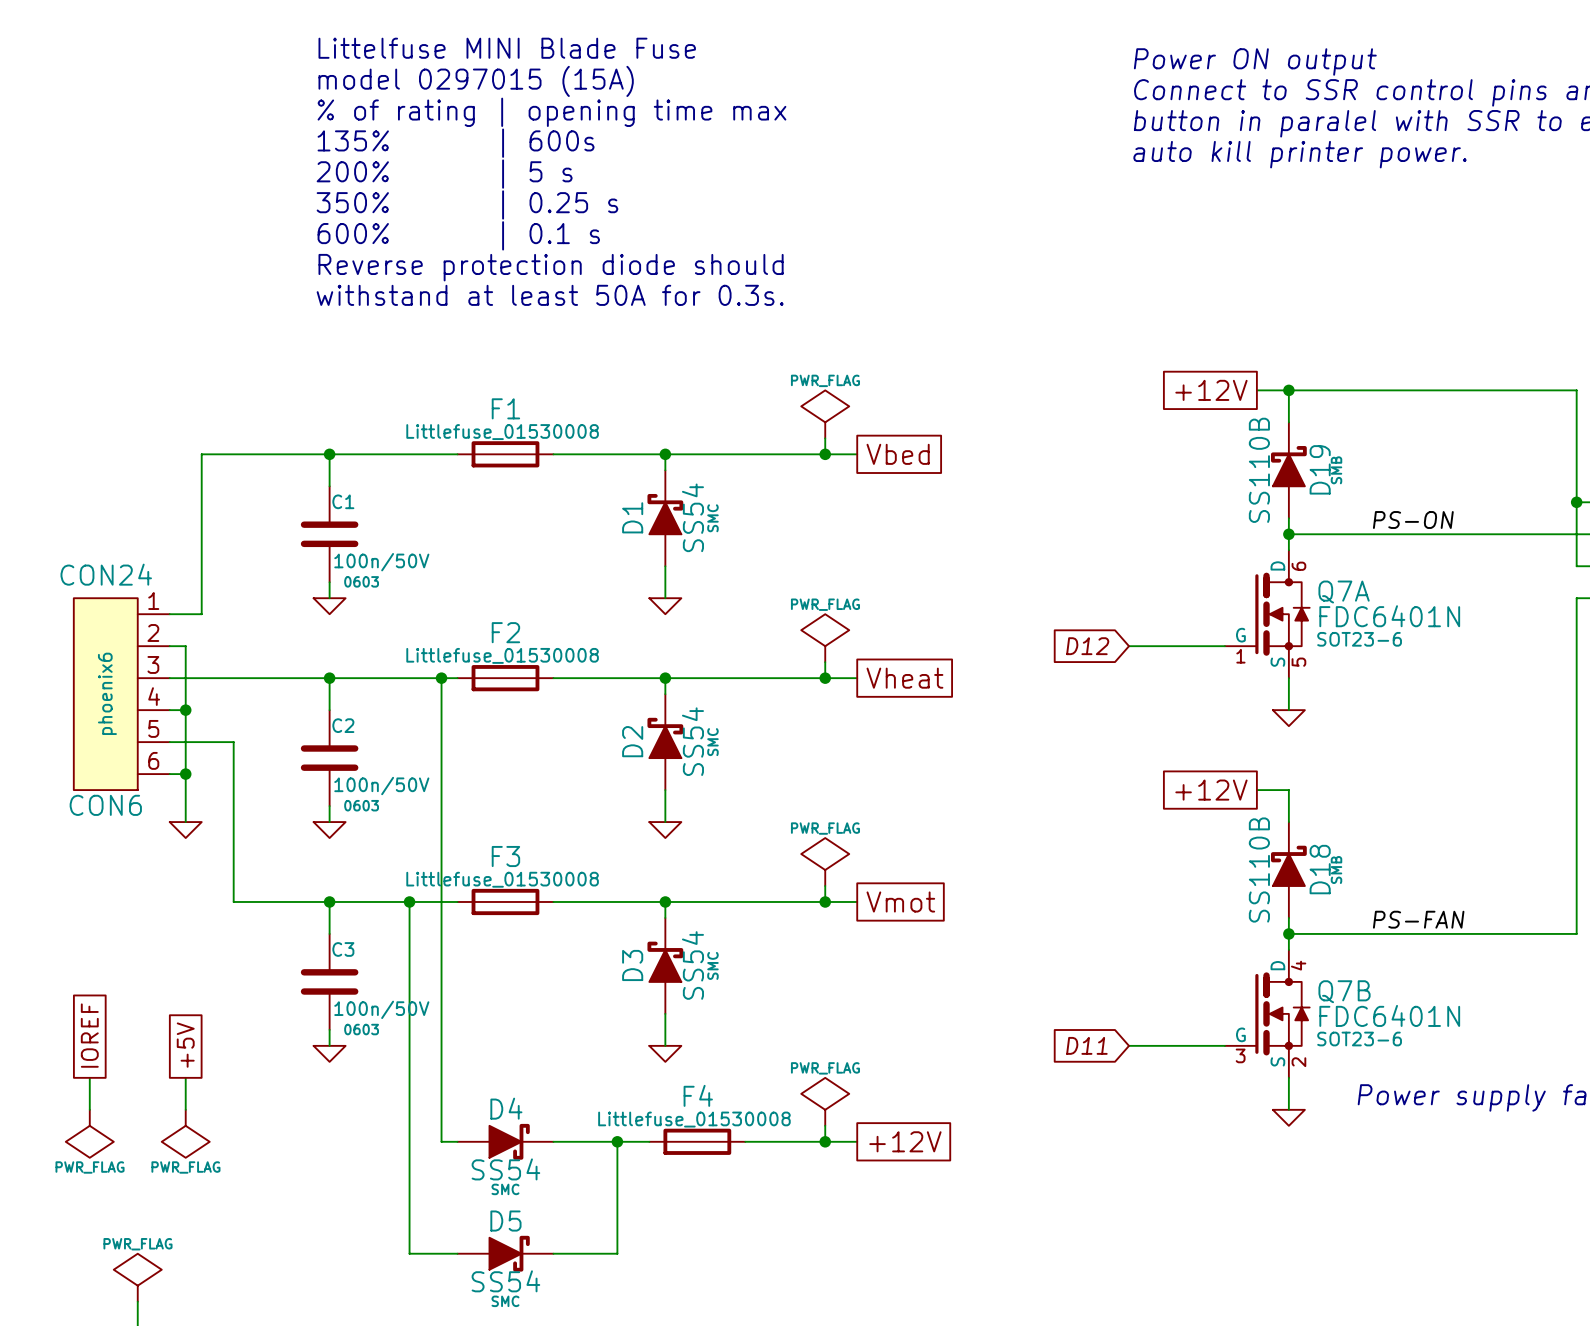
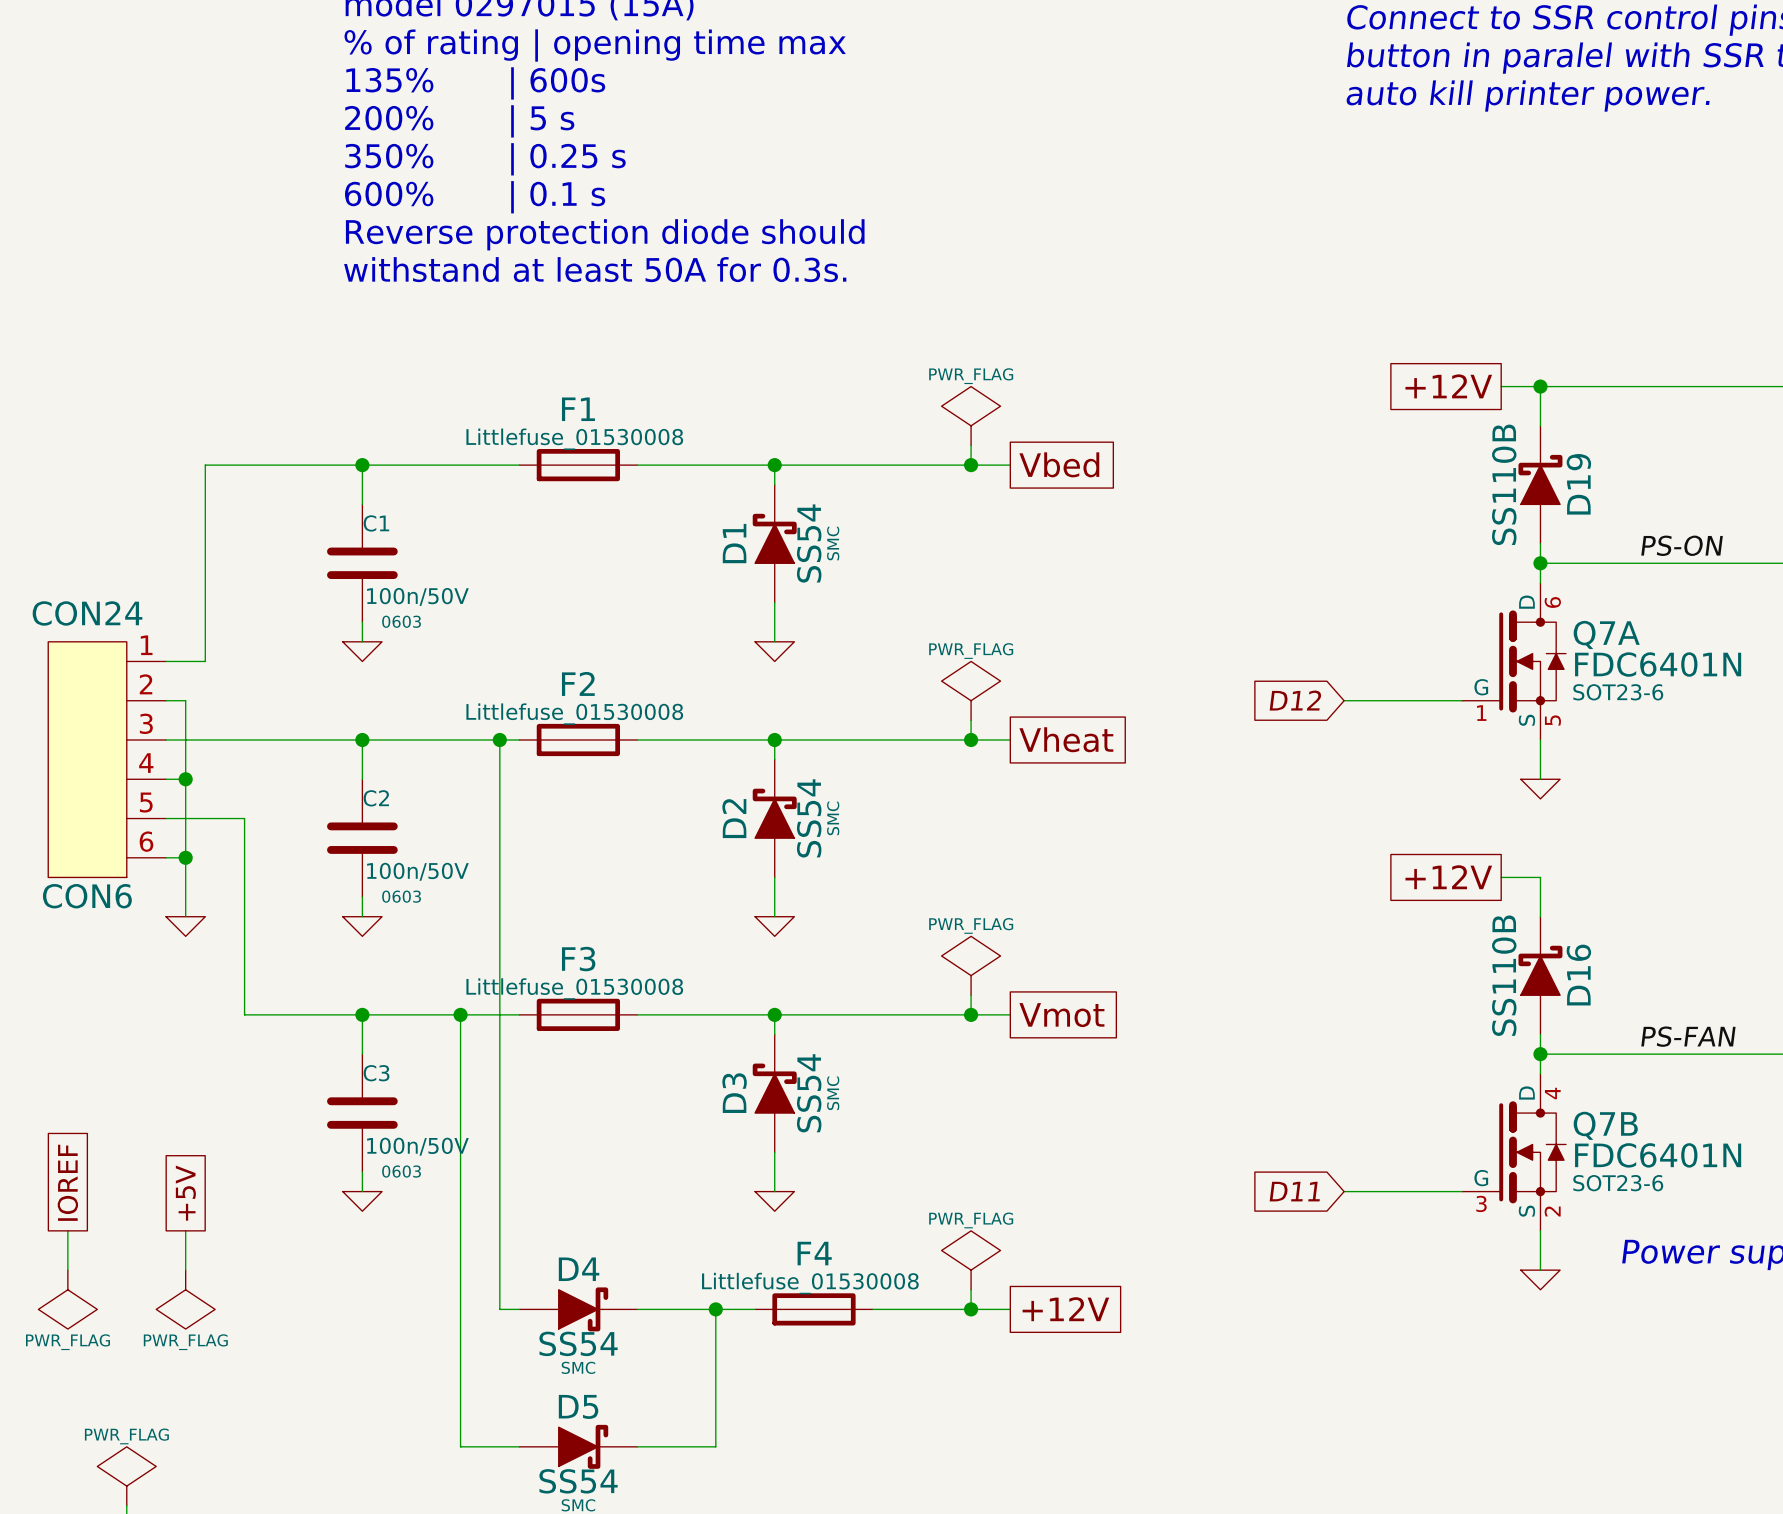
D19 text: SMB (1336, 470) -> none
CON24 text: phoenix6 (107, 693) -> none
D18 name: D18 (1320, 869) -> D16 (1578, 975)
D18 text: SMB (1336, 870) -> none

